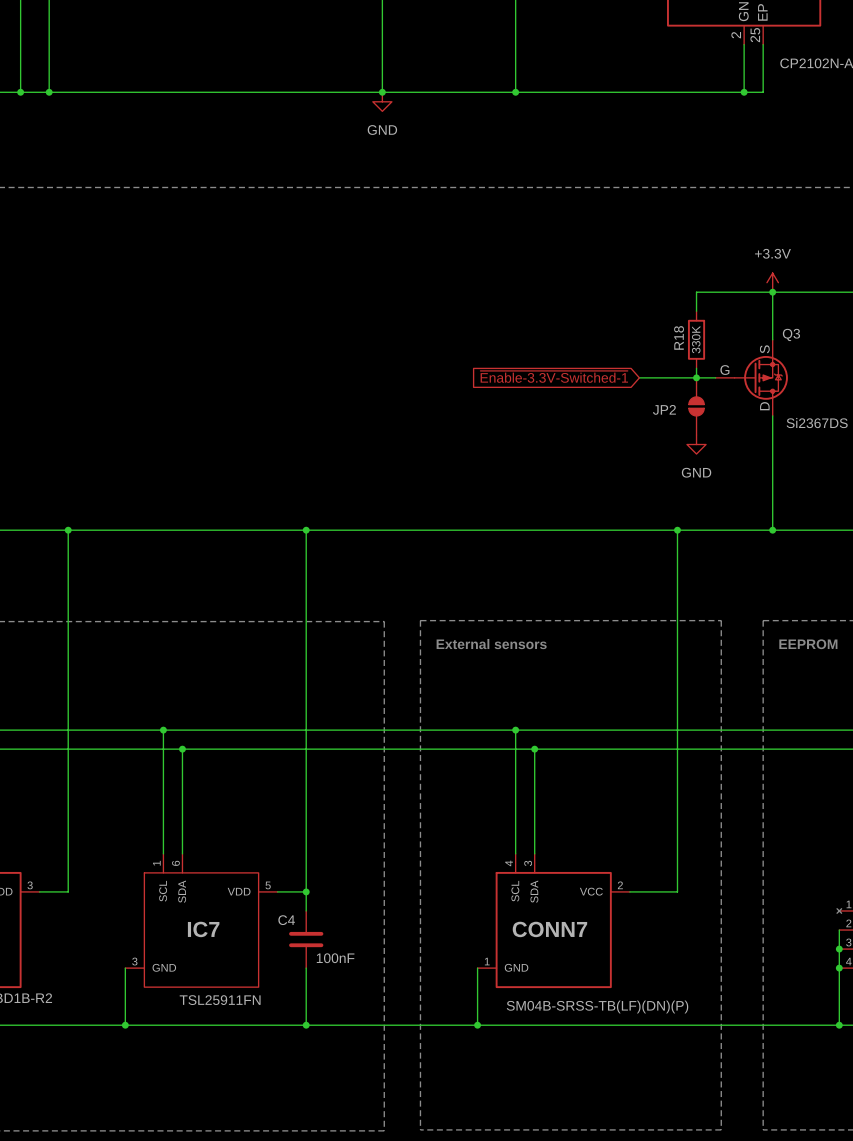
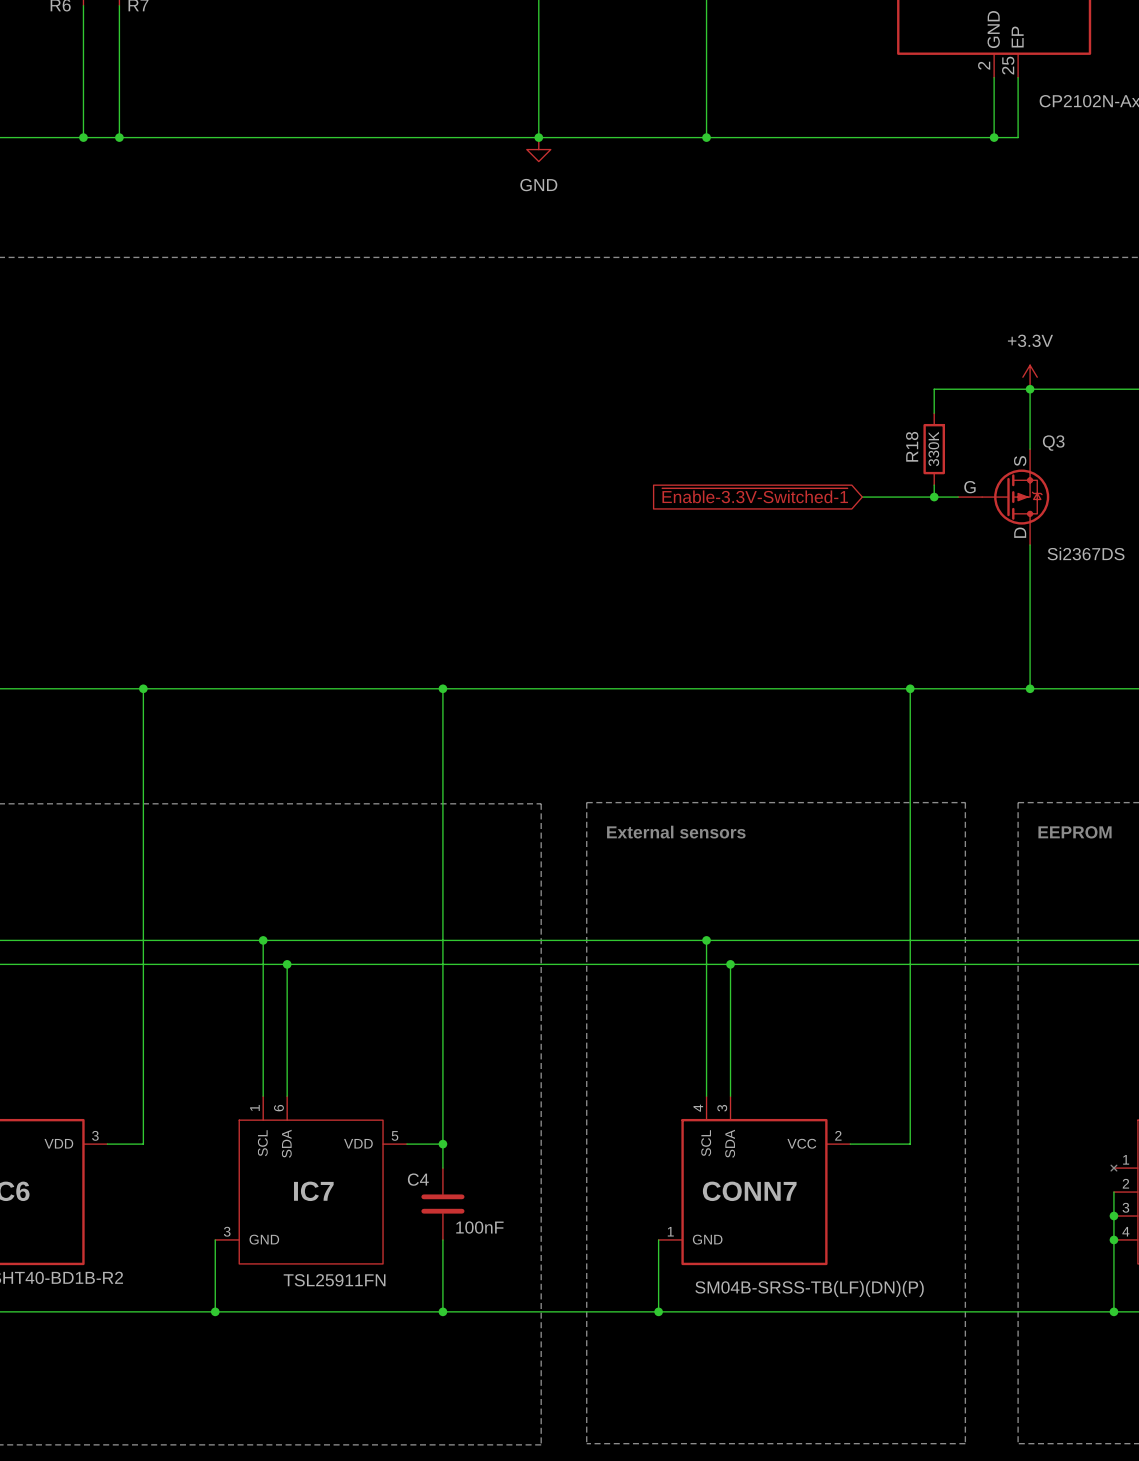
JP2: (696, 406) -> none
power symbol: GND (696, 444) -> none

